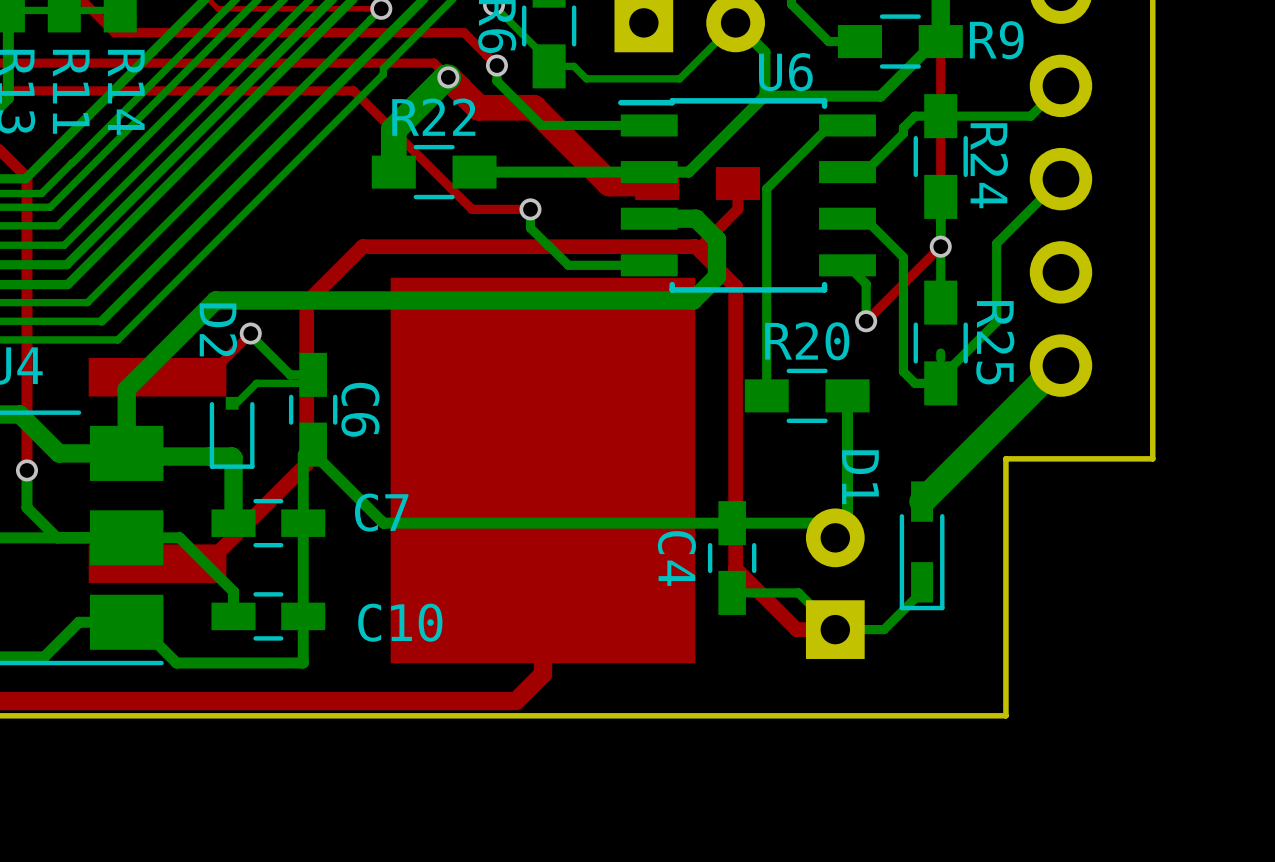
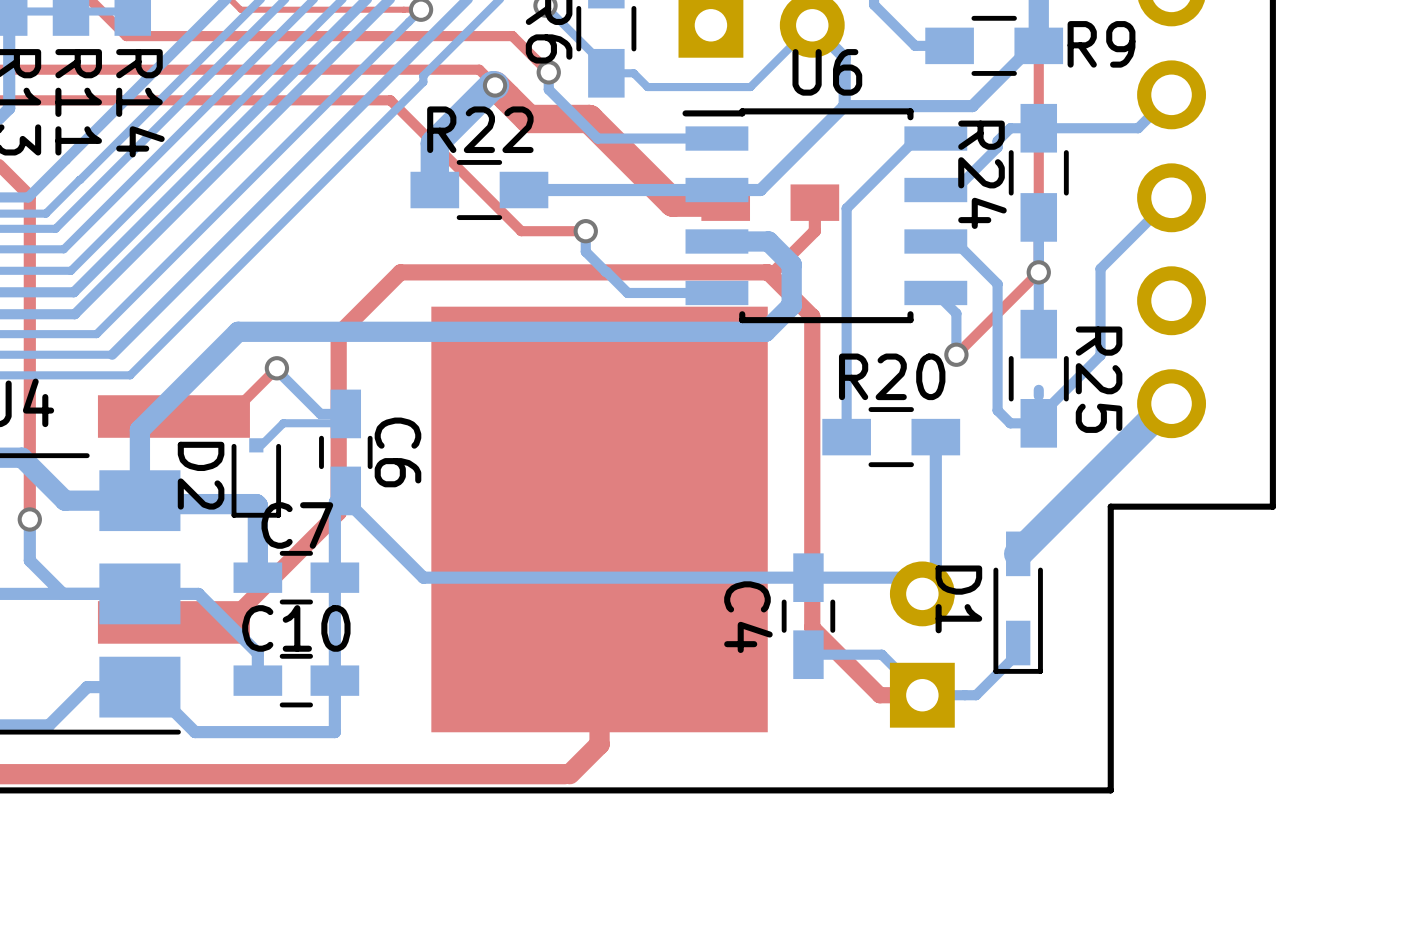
U6 name position: U6 (785, 72) -> U6 (827, 72)
R24 name position: R24 (989, 165) -> R24 (982, 174)
D2 name position: D2 (218, 329) -> D2 (201, 475)
D1 name position: D1 (860, 477) -> D1 (958, 599)
C7 name position: C7 (381, 512) -> C7 (297, 525)
C10 name position: C10 (400, 622) -> C10 (296, 628)

